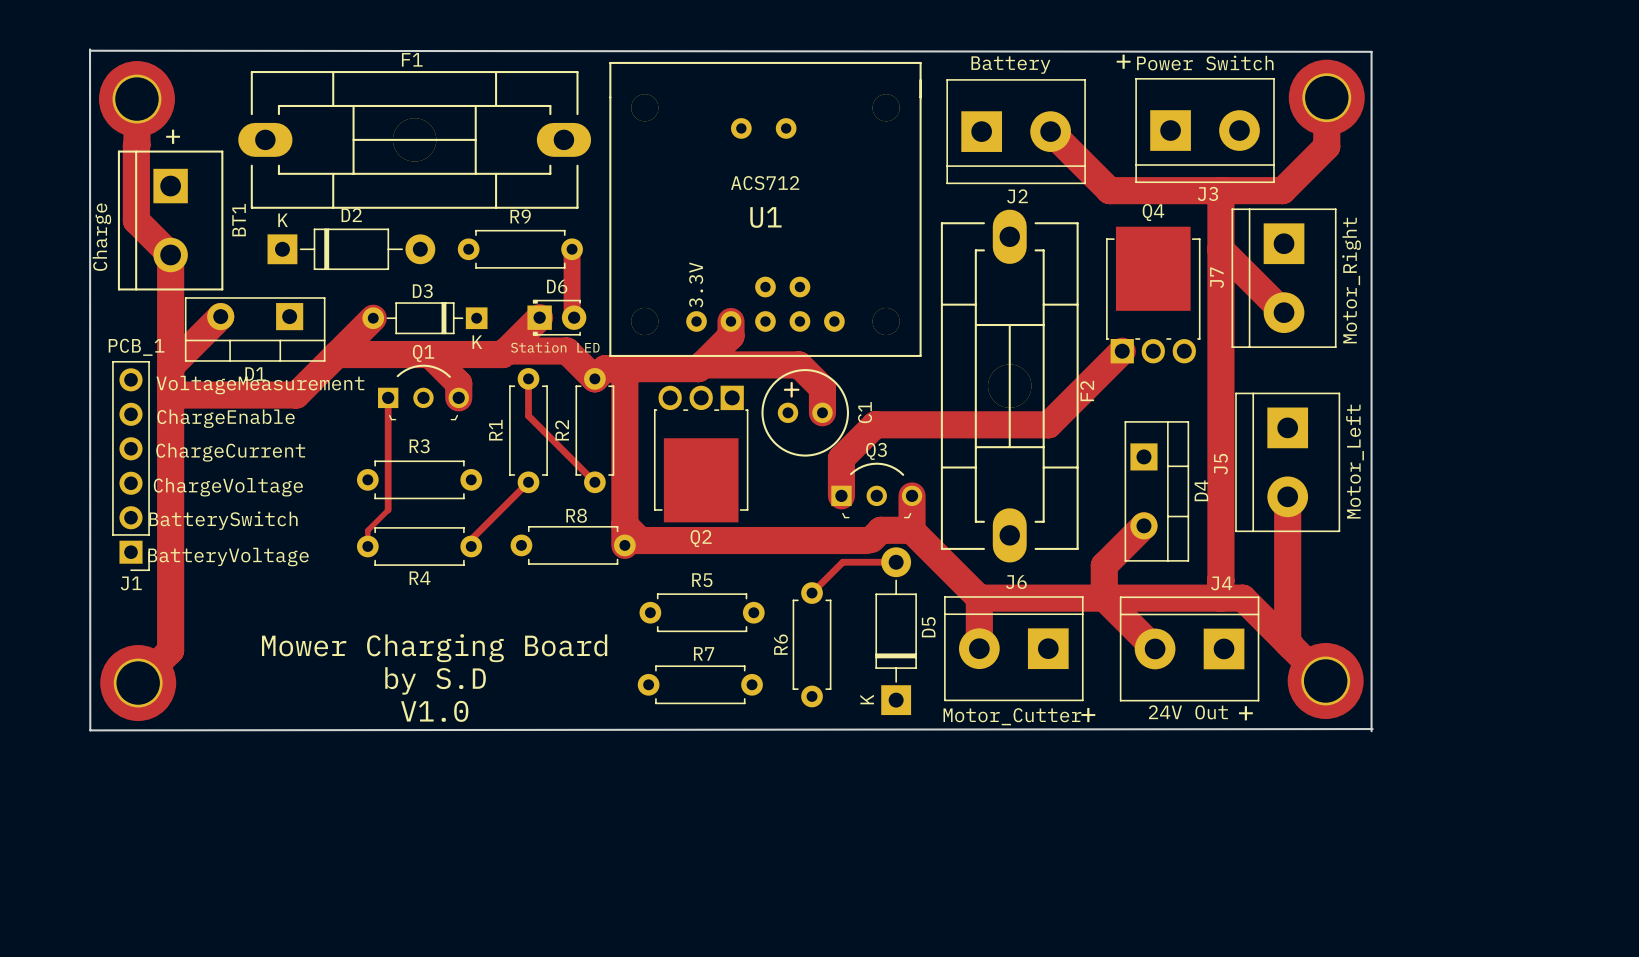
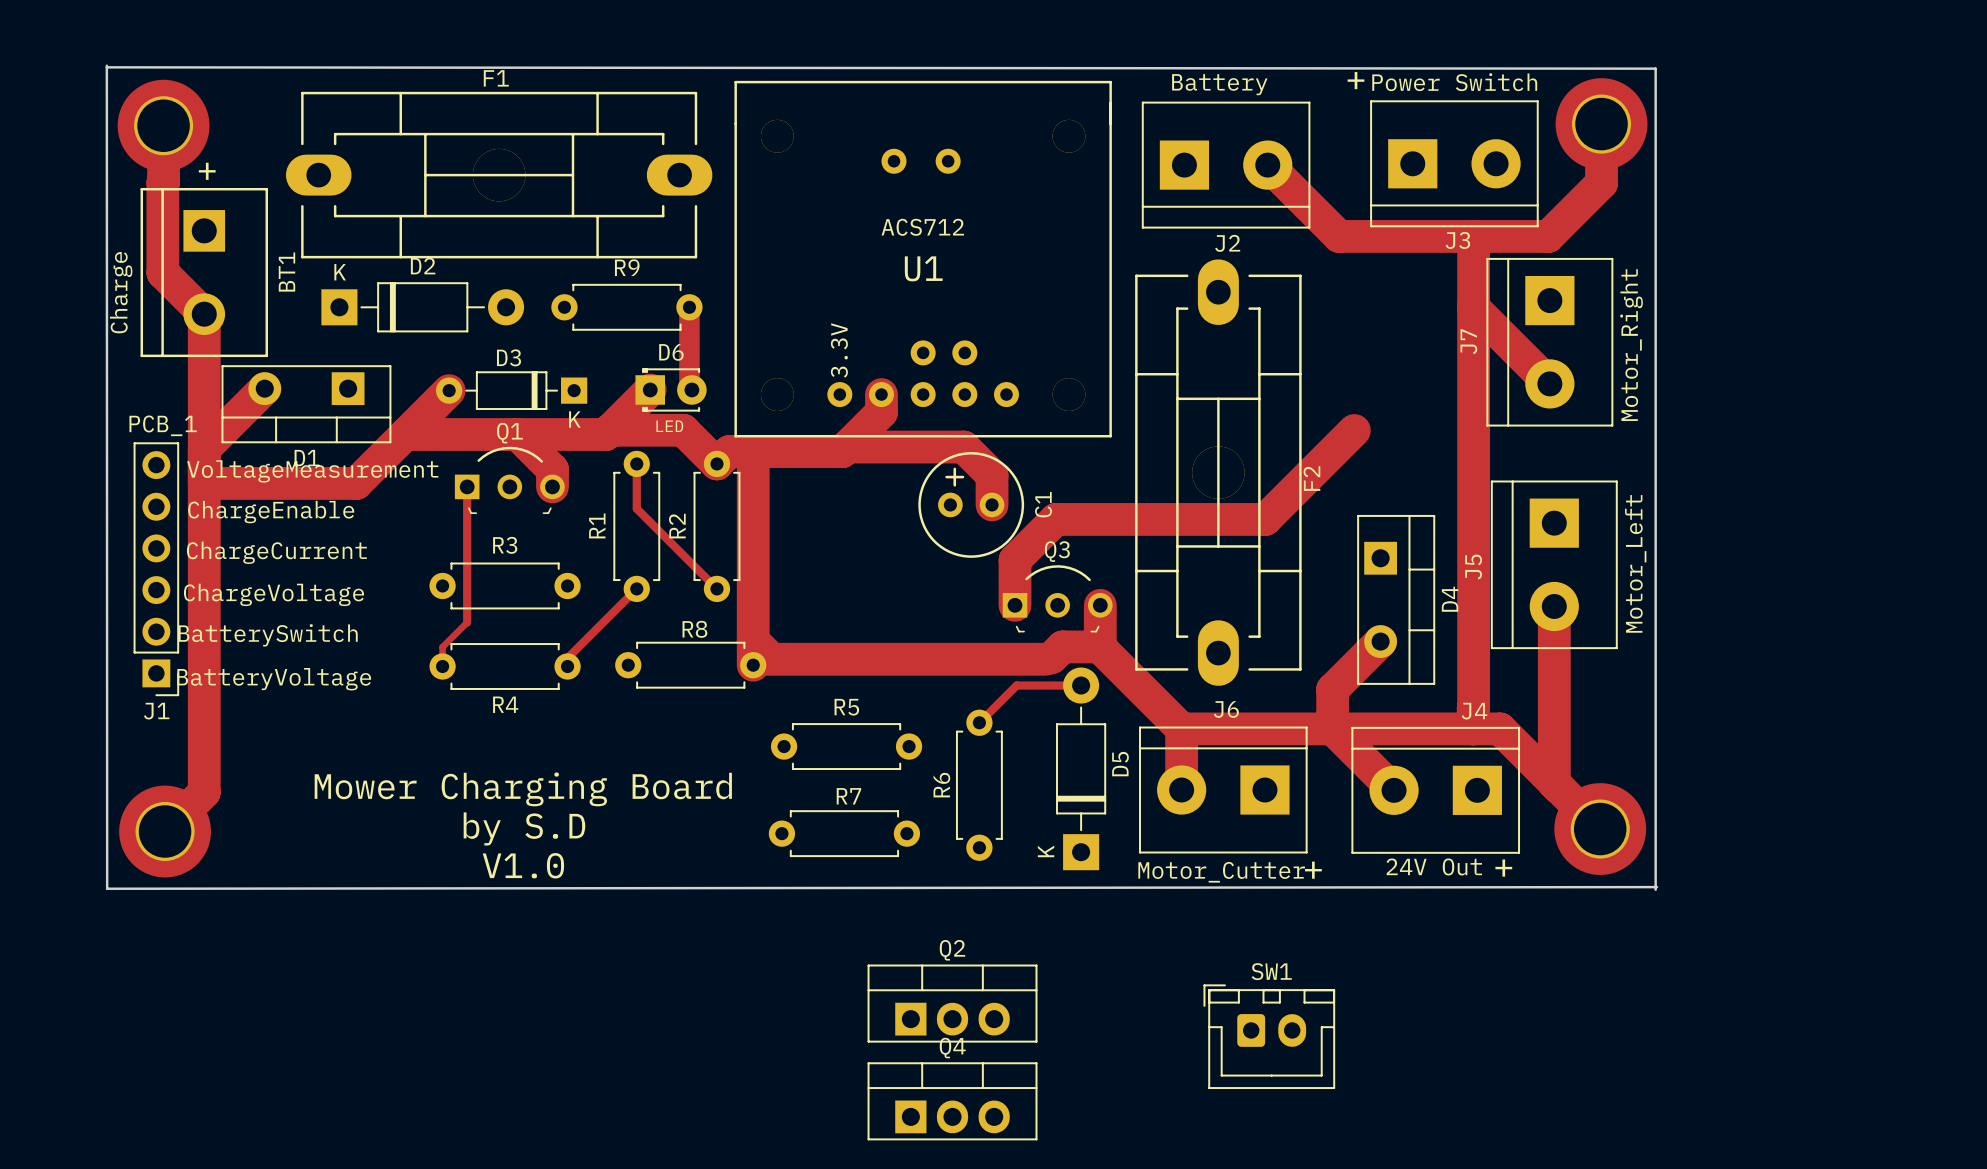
Q4 name position: Q4 (1153, 212) -> Q4 (952, 1048)
Q4 footprint: [1106, 226, 1201, 364] -> [867, 1062, 1038, 1141]
D6 value: Station LED (555, 347) -> LED (669, 426)
Q2 footprint: [653, 385, 749, 523] -> [867, 964, 1038, 1043]
Q2 name position: Q2 (701, 538) -> Q2 (952, 950)
SW1: none -> (1269, 1036)

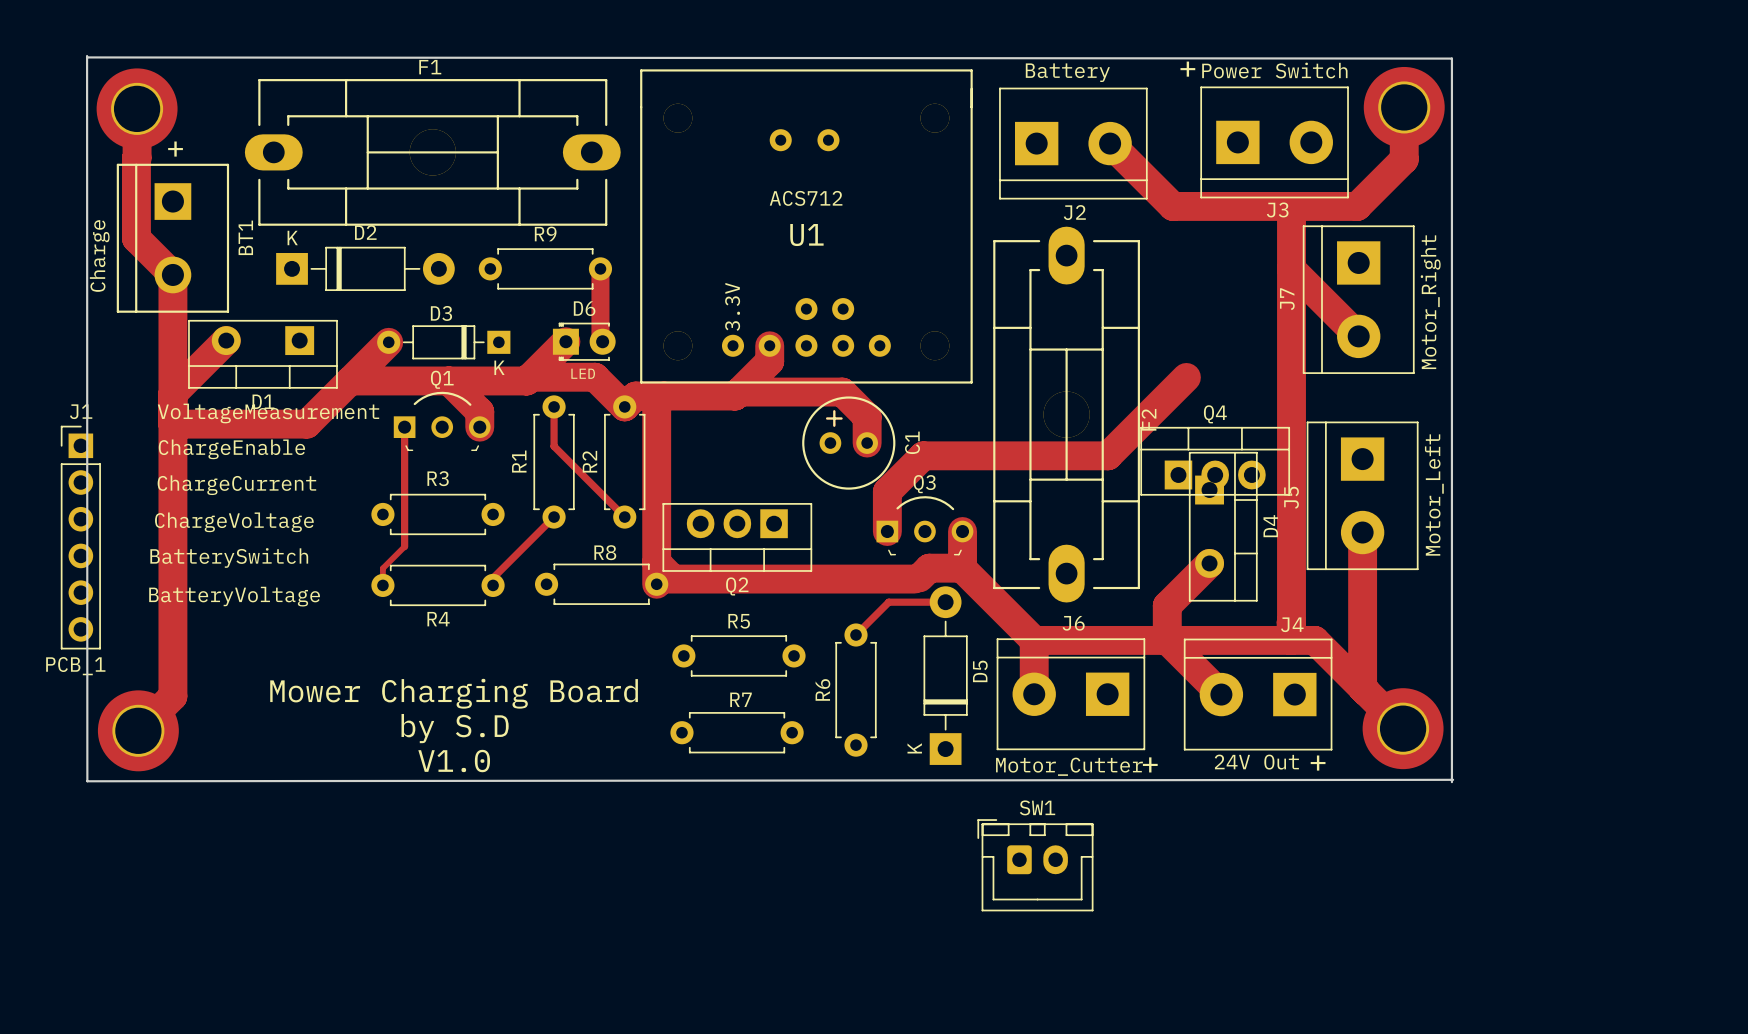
J1 rotation: 0° (156, 569) -> 180° (80, 537)
Q2 rotation: 0° (952, 1003) -> 180° (737, 537)
Q2 position: (952, 1003) -> (737, 537)
SW1 position: (1269, 1036) -> (1035, 865)
Q4 position: (952, 1101) -> (1215, 461)

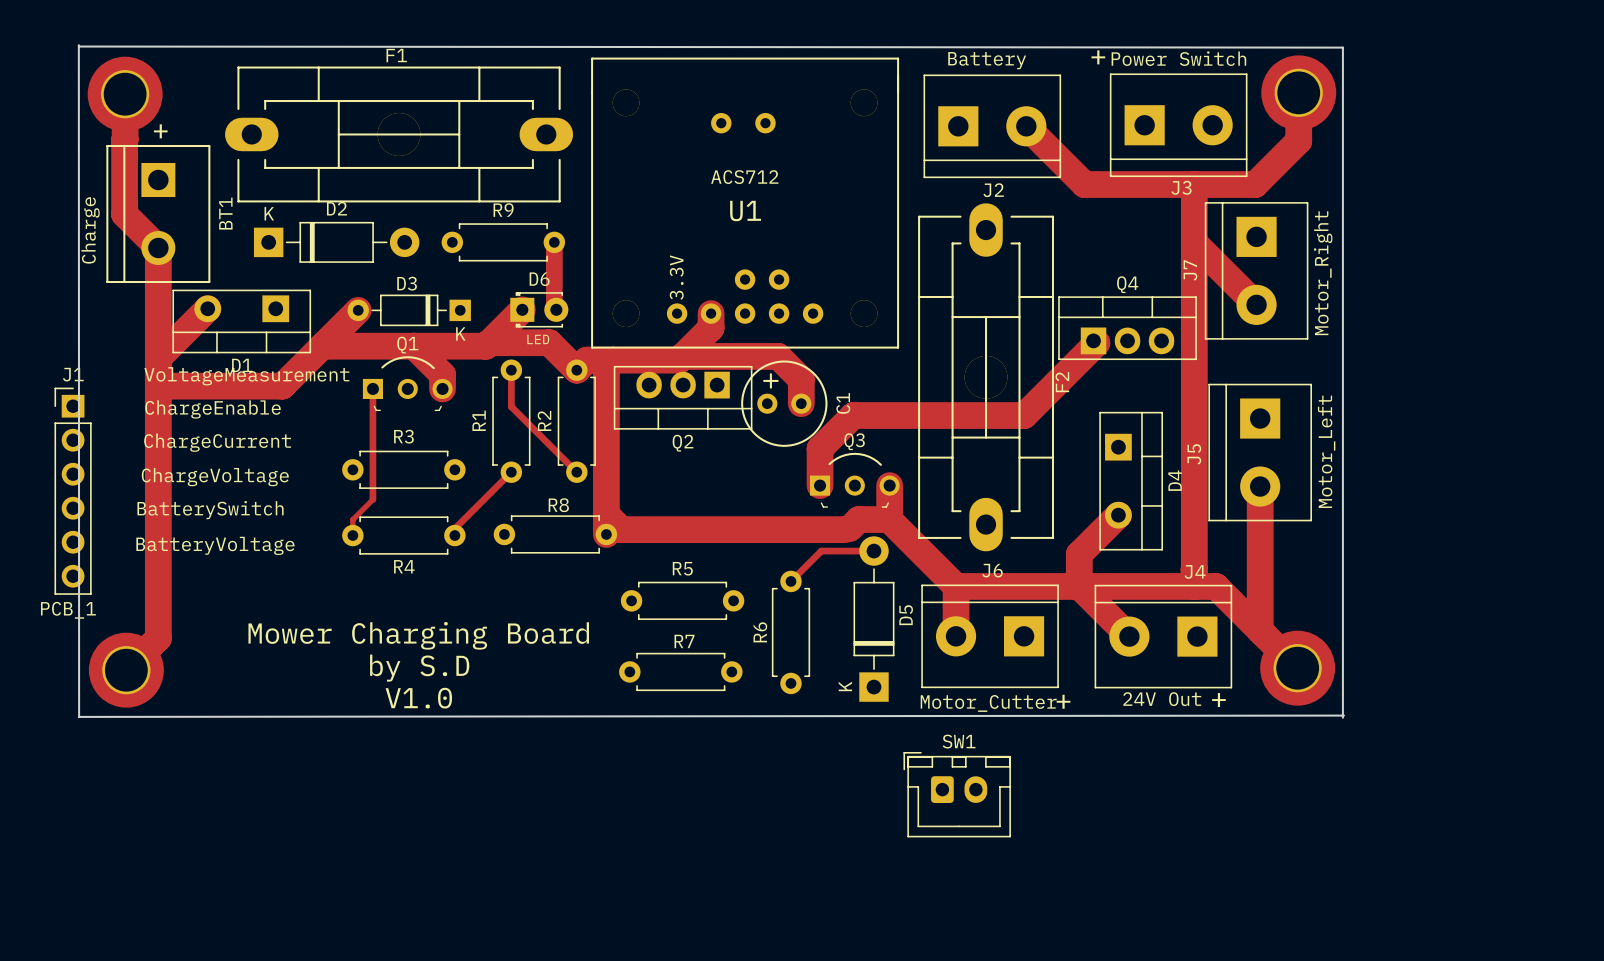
Q4 position: (1215, 461) -> (1127, 328)
Q2 position: (737, 537) -> (683, 397)

